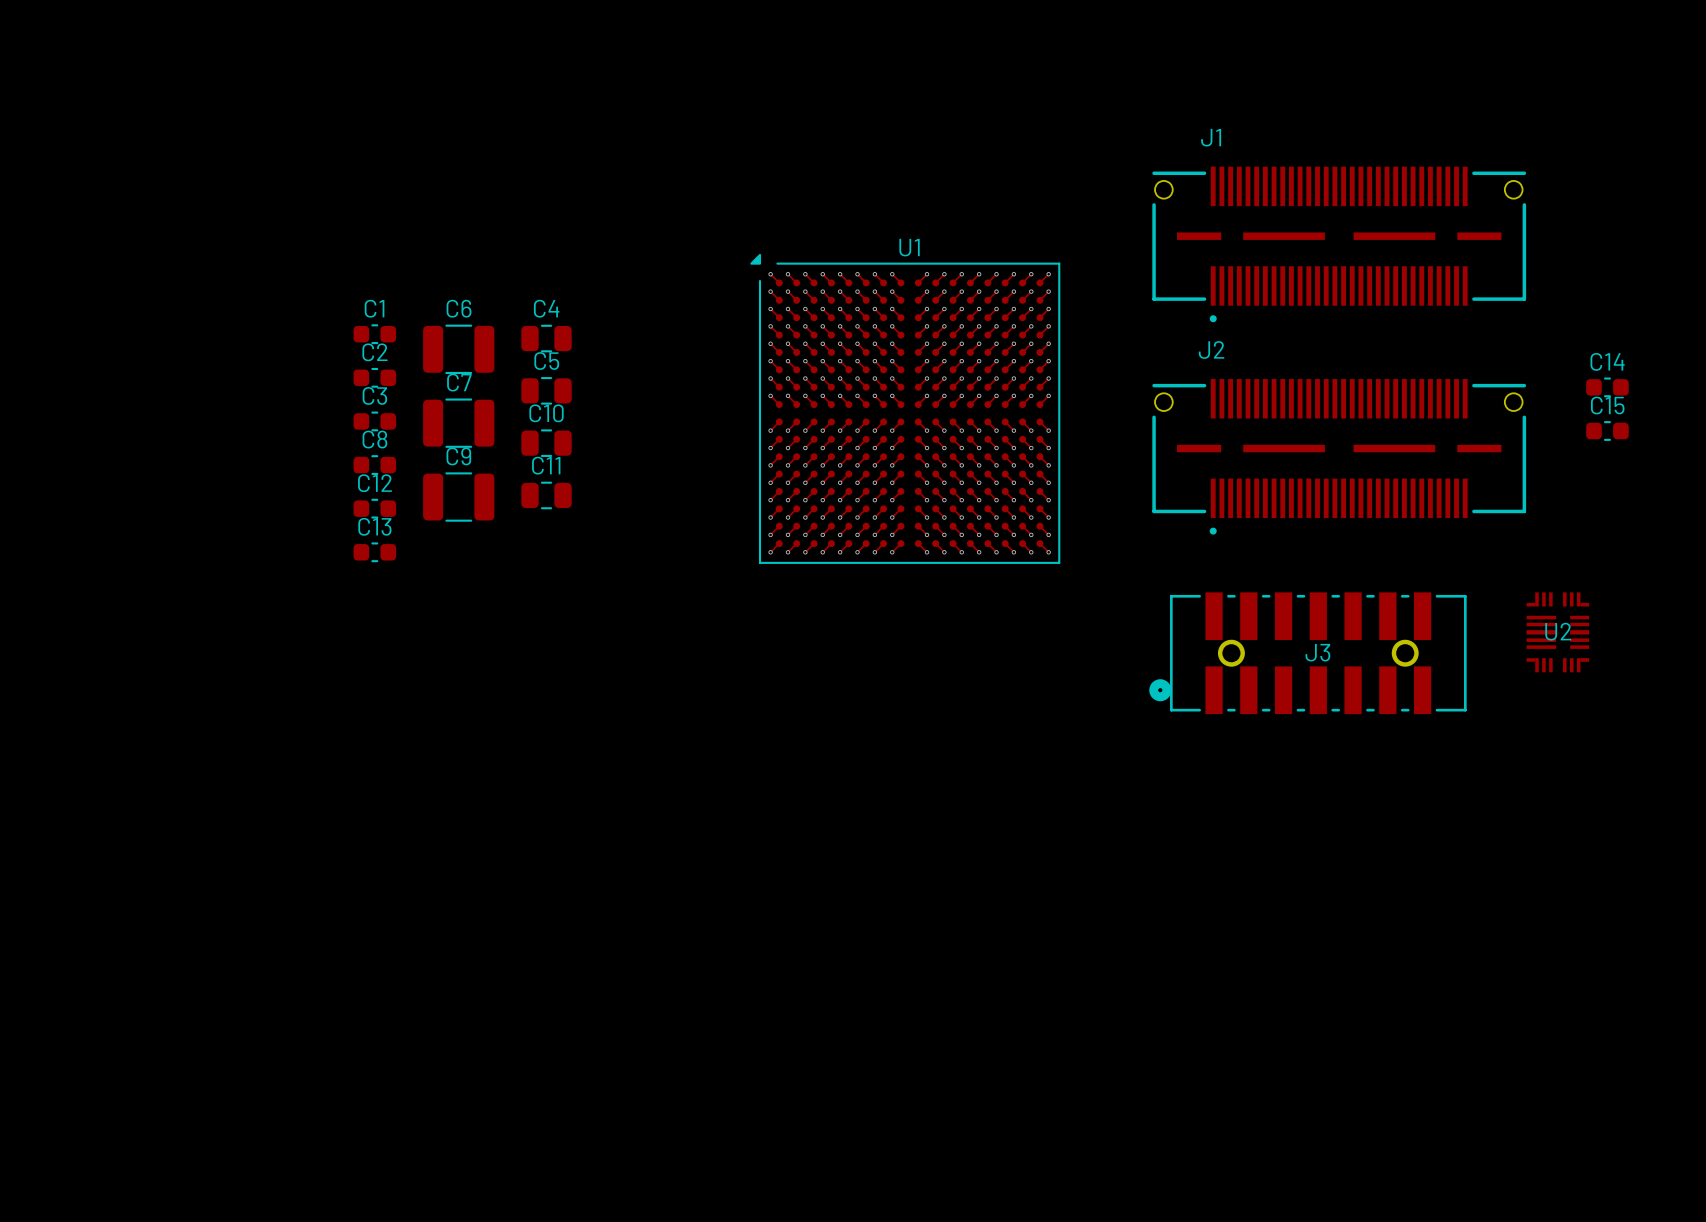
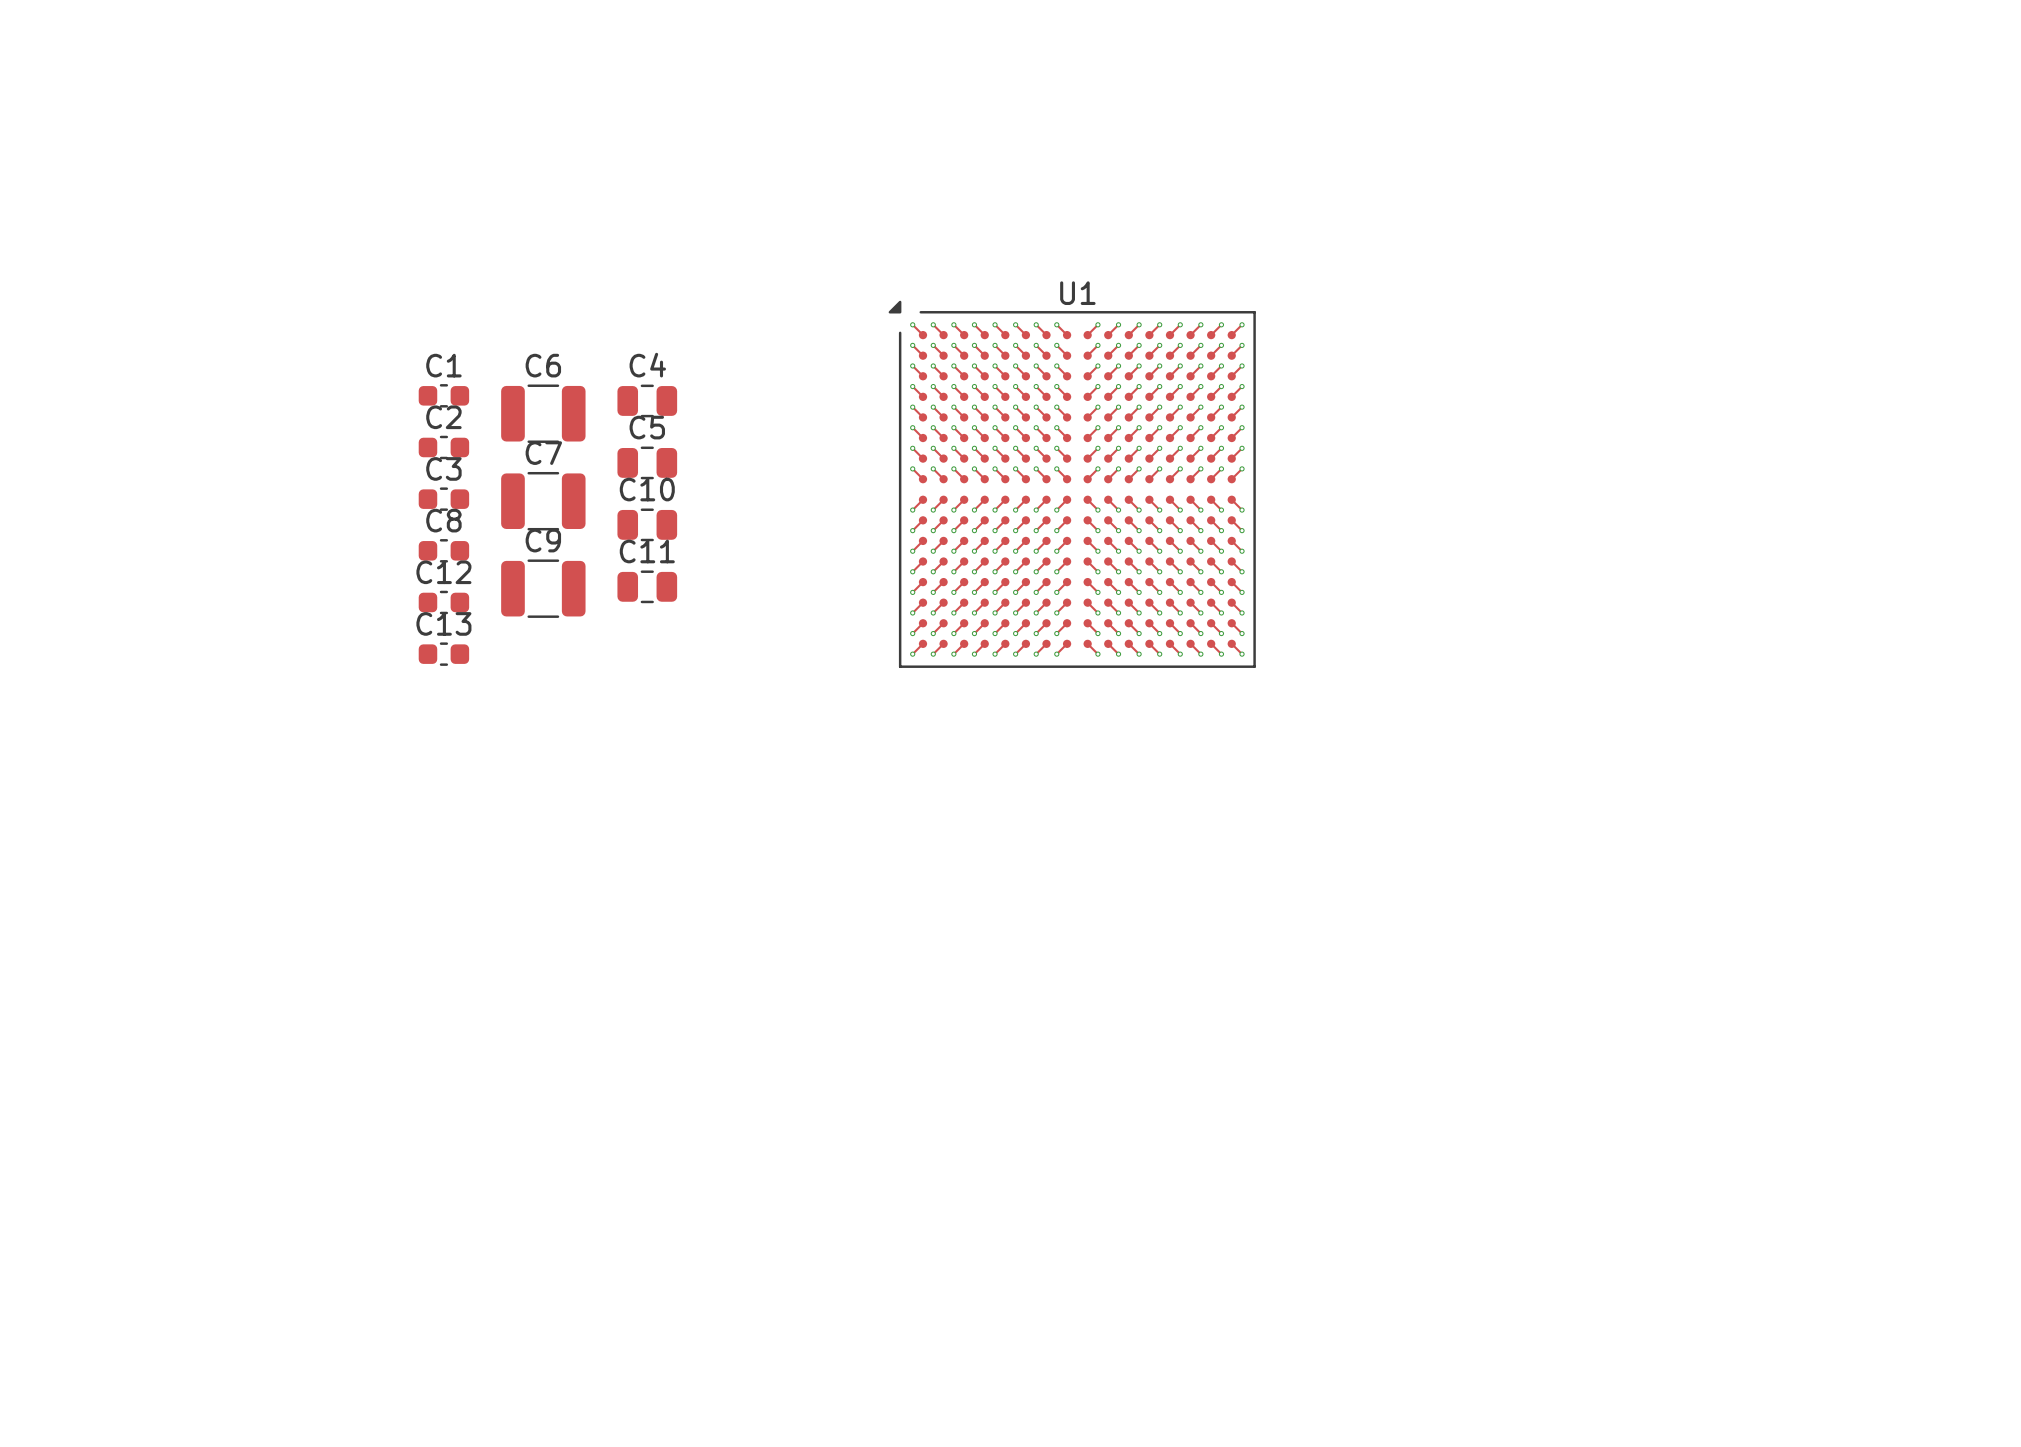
J1: (1339, 244) -> none
C14: (1607, 387) -> none
C15: (1607, 431) -> none
J2: (1339, 456) -> none
U2: (1557, 632) -> none
J3: (1307, 653) -> none

